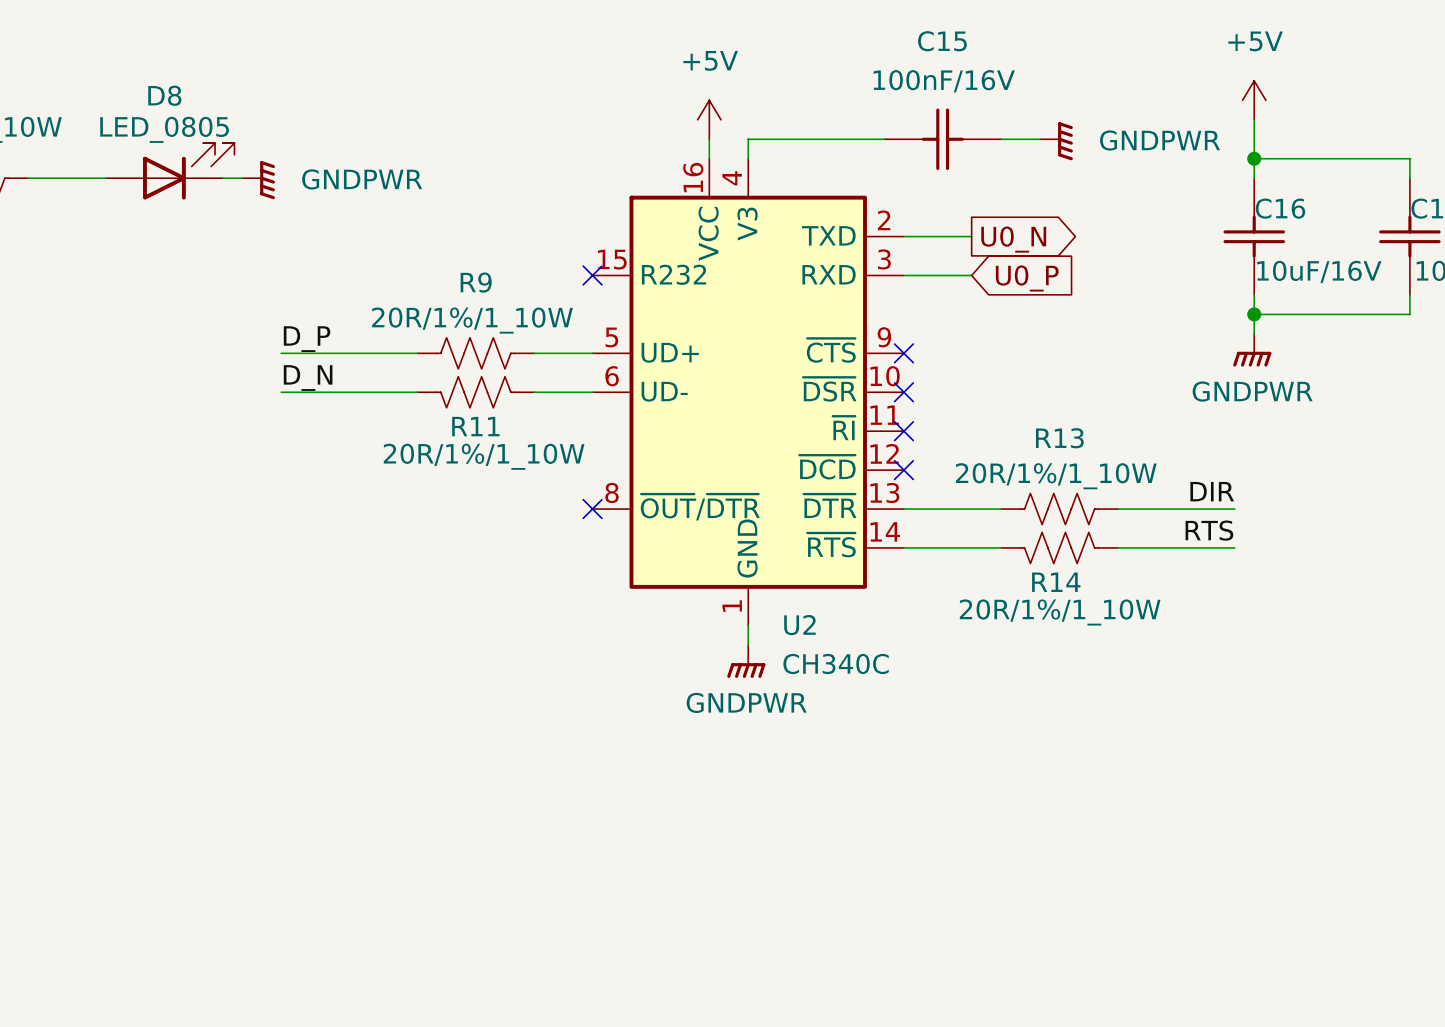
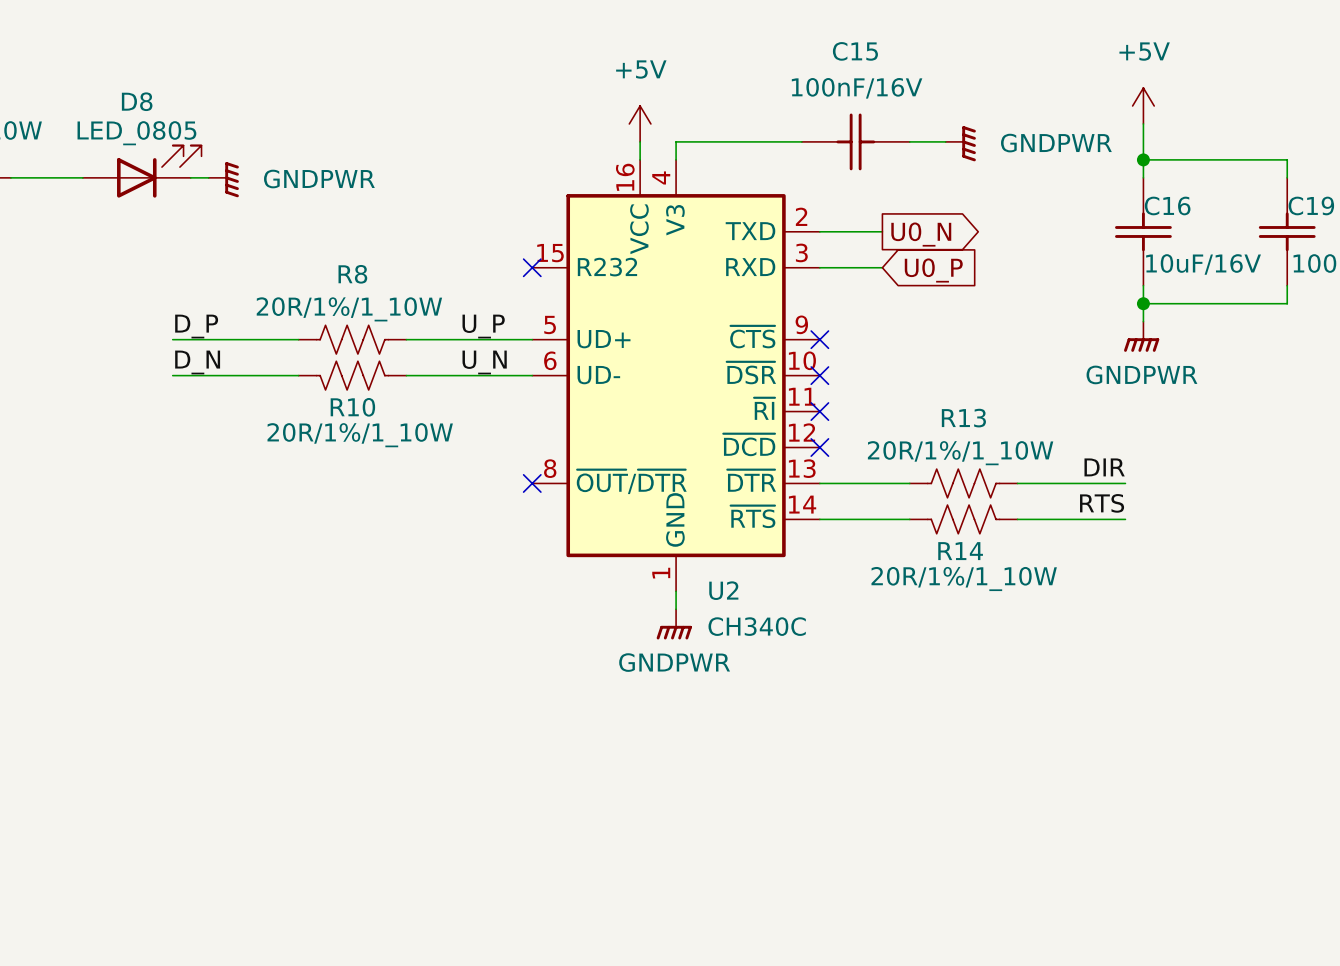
label position: D_P (307, 339) -> D_P (196, 326)
label: none -> U_P (483, 326)
wire: none -> (172, 339) (244, 339)
wire: (339, 353) (417, 353) -> (406, 339) (478, 339)
R8: none -> 20R/1%/1_10W (352, 339)
R9: 20R/1%/1_10W (475, 353) -> none
label position: D_N (308, 378) -> D_N (197, 362)
label: none -> U_N (484, 362)
wire: none -> (172, 375) (244, 375)
wire: (339, 392) (417, 392) -> (406, 375) (478, 375)
R10: none -> 20R/1%/1_10W (352, 375)
R11: 20R/1%/1_10W (475, 392) -> none

